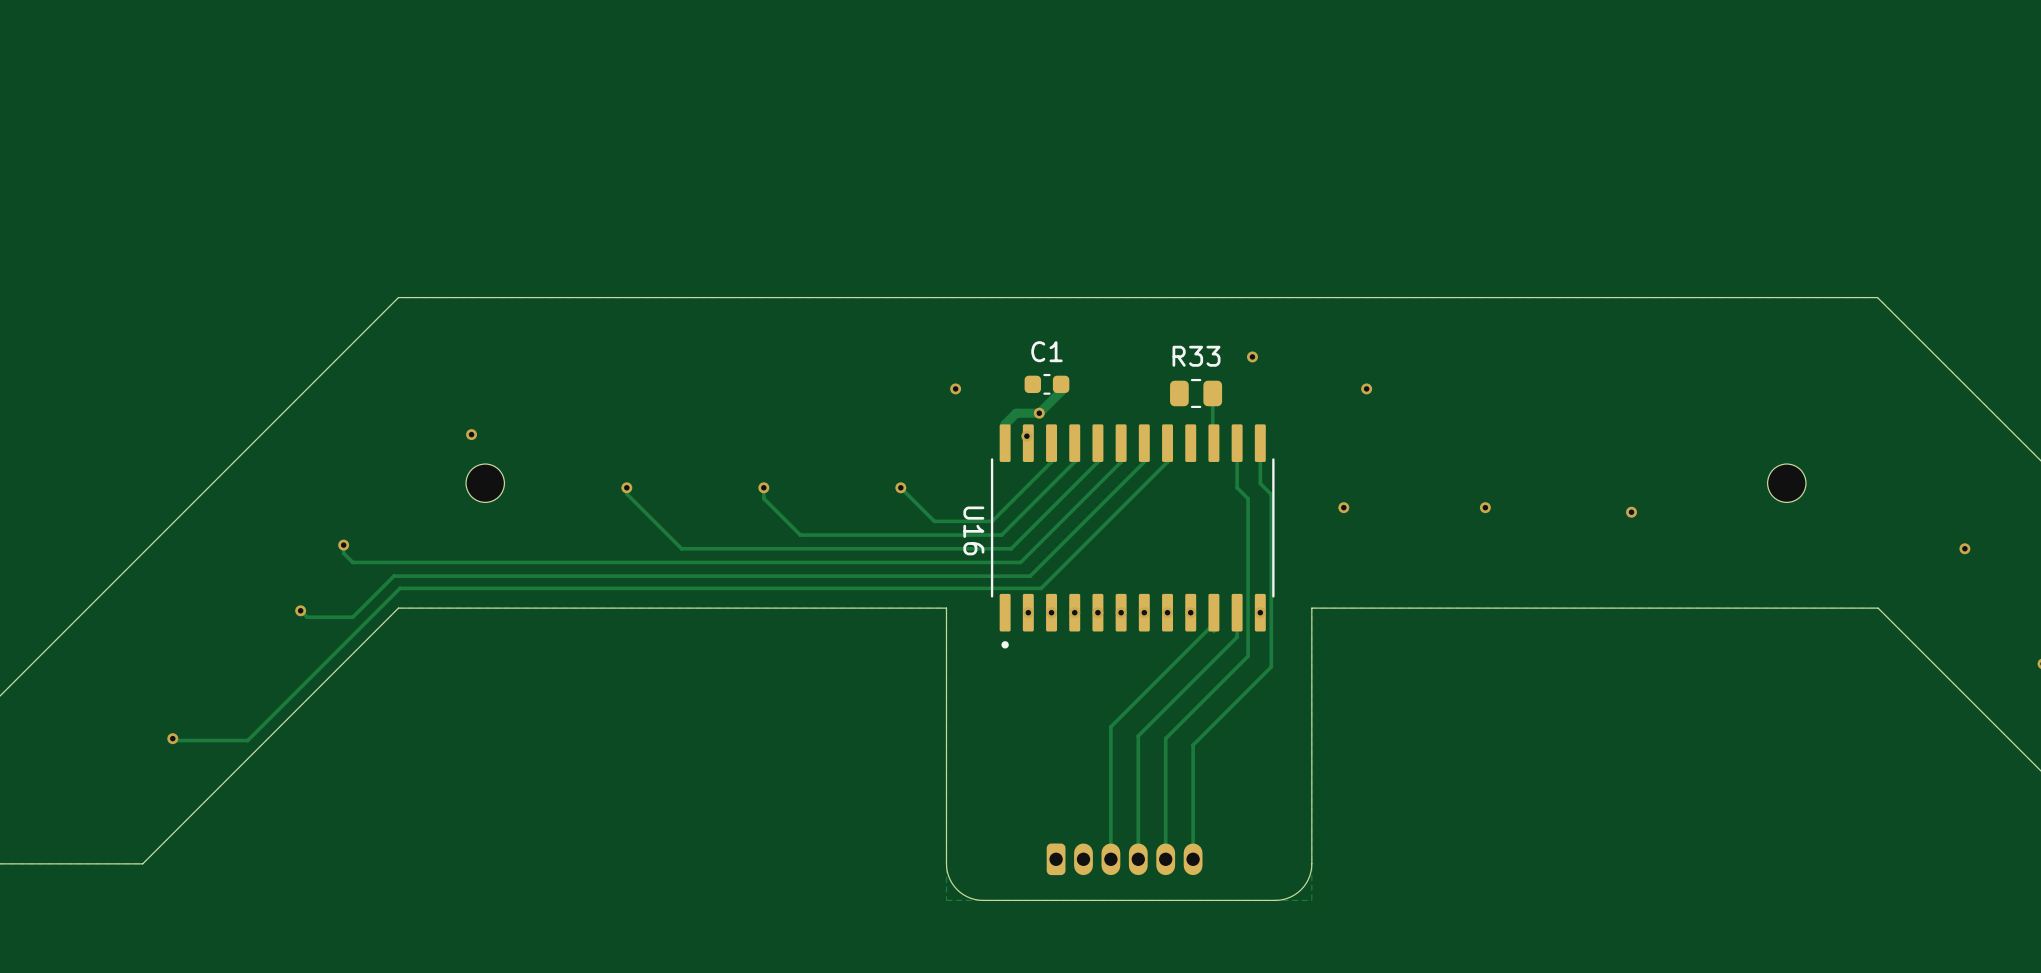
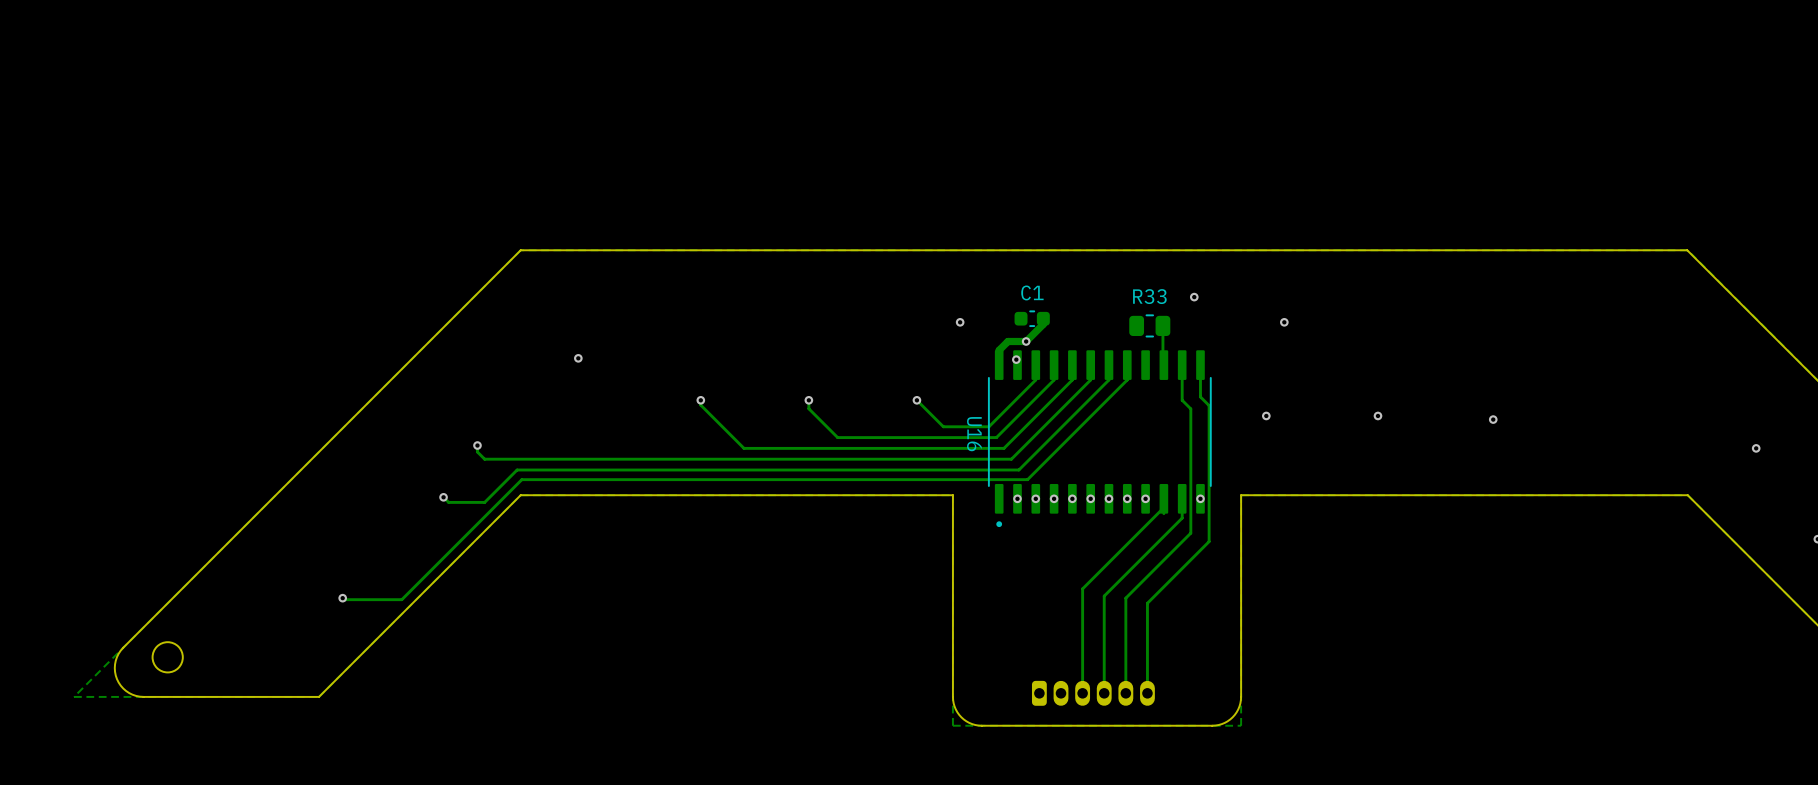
part: (485, 483) -> none
part: (1786, 483) -> none

